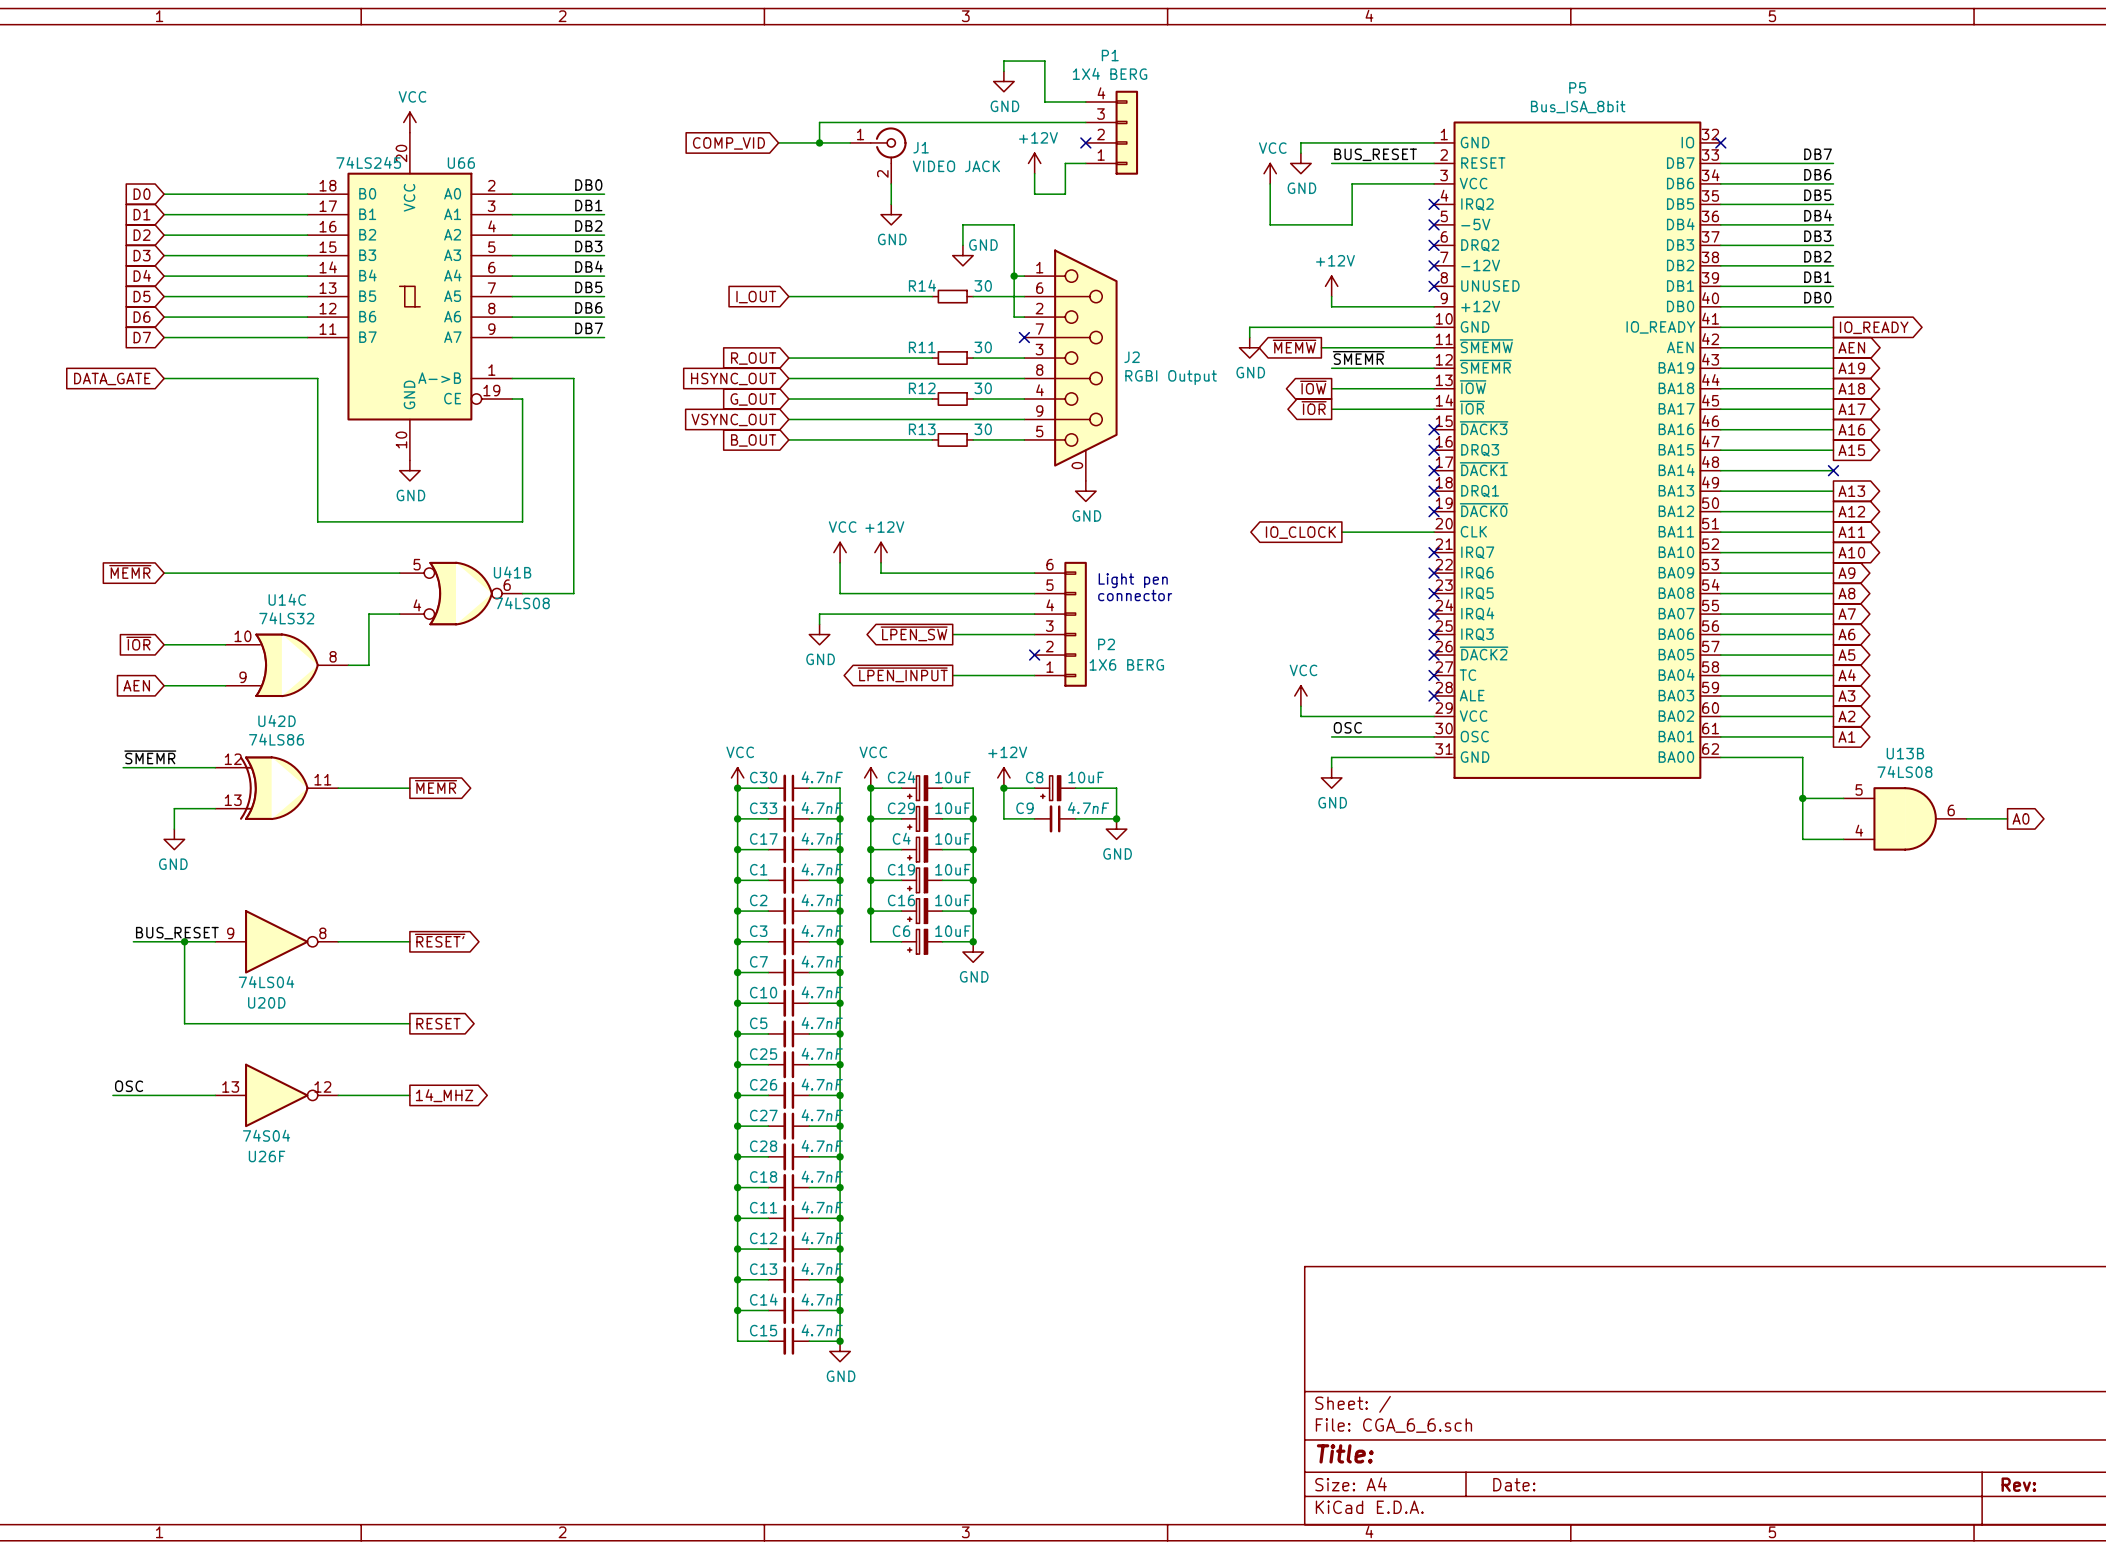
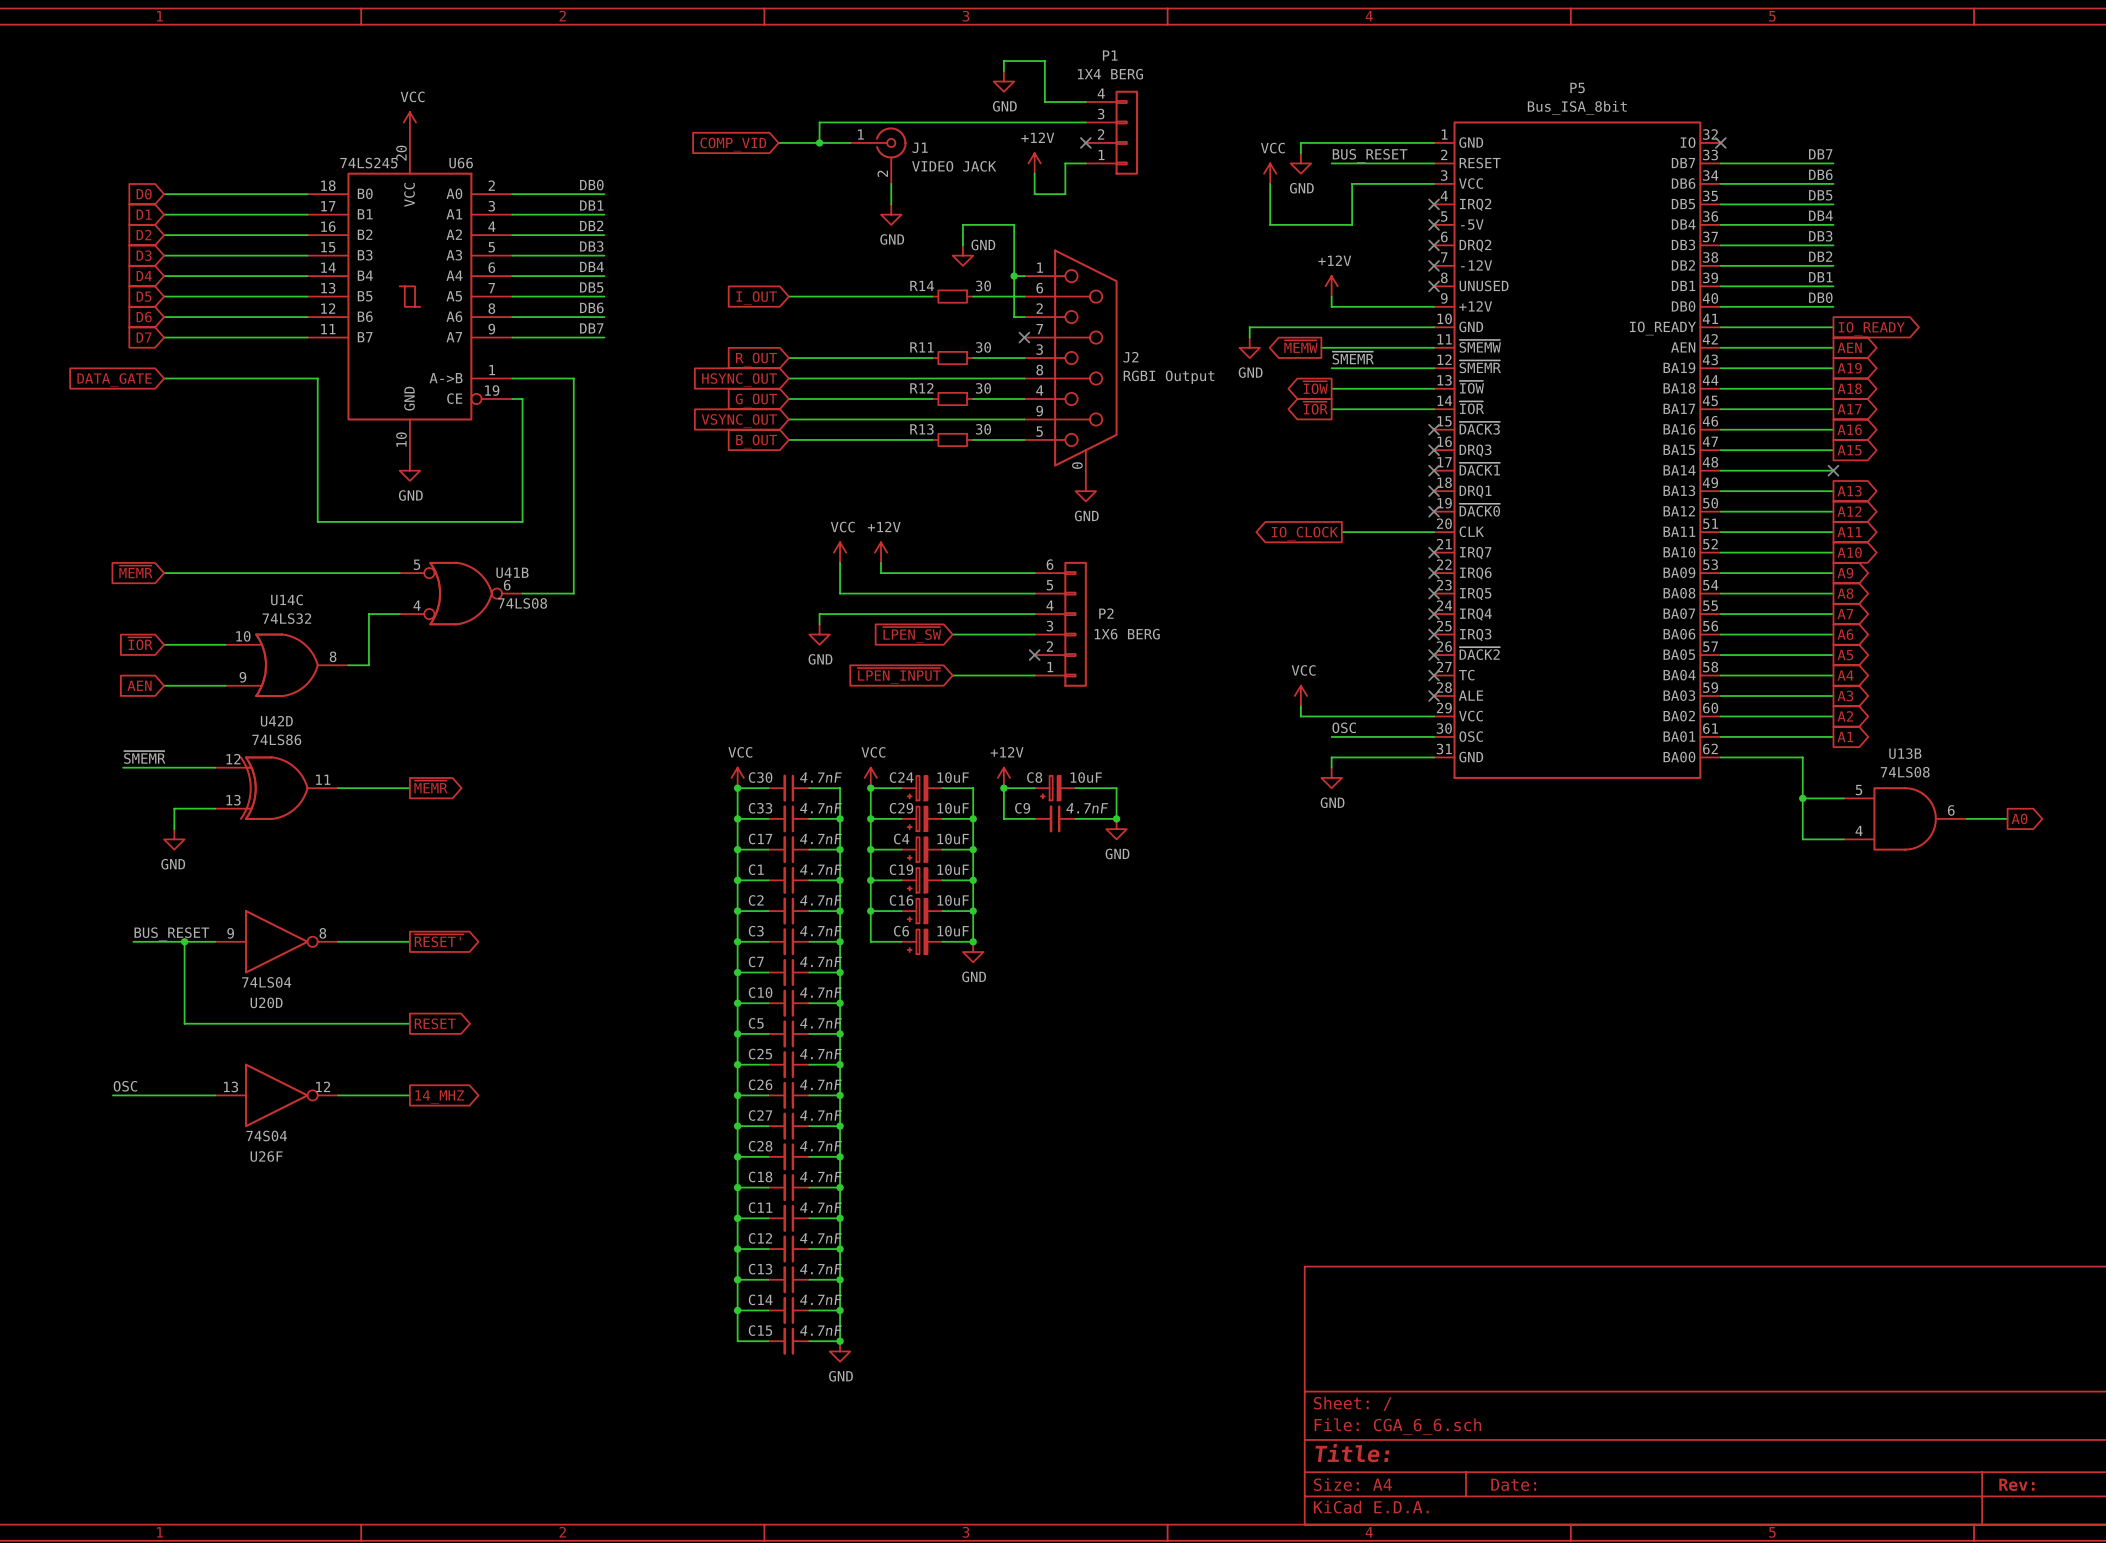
text: Light pen (1133, 580) -> none
text: connector (1135, 595) -> none
global label shape: output (914, 633) -> input (912, 635)
P2 name position: P2 (1106, 644) -> P2 (1106, 613)
P2 value position: 1X6 BERG (1126, 664) -> 1X6 BERG (1127, 634)
global label shape: output (902, 674) -> input (899, 675)

